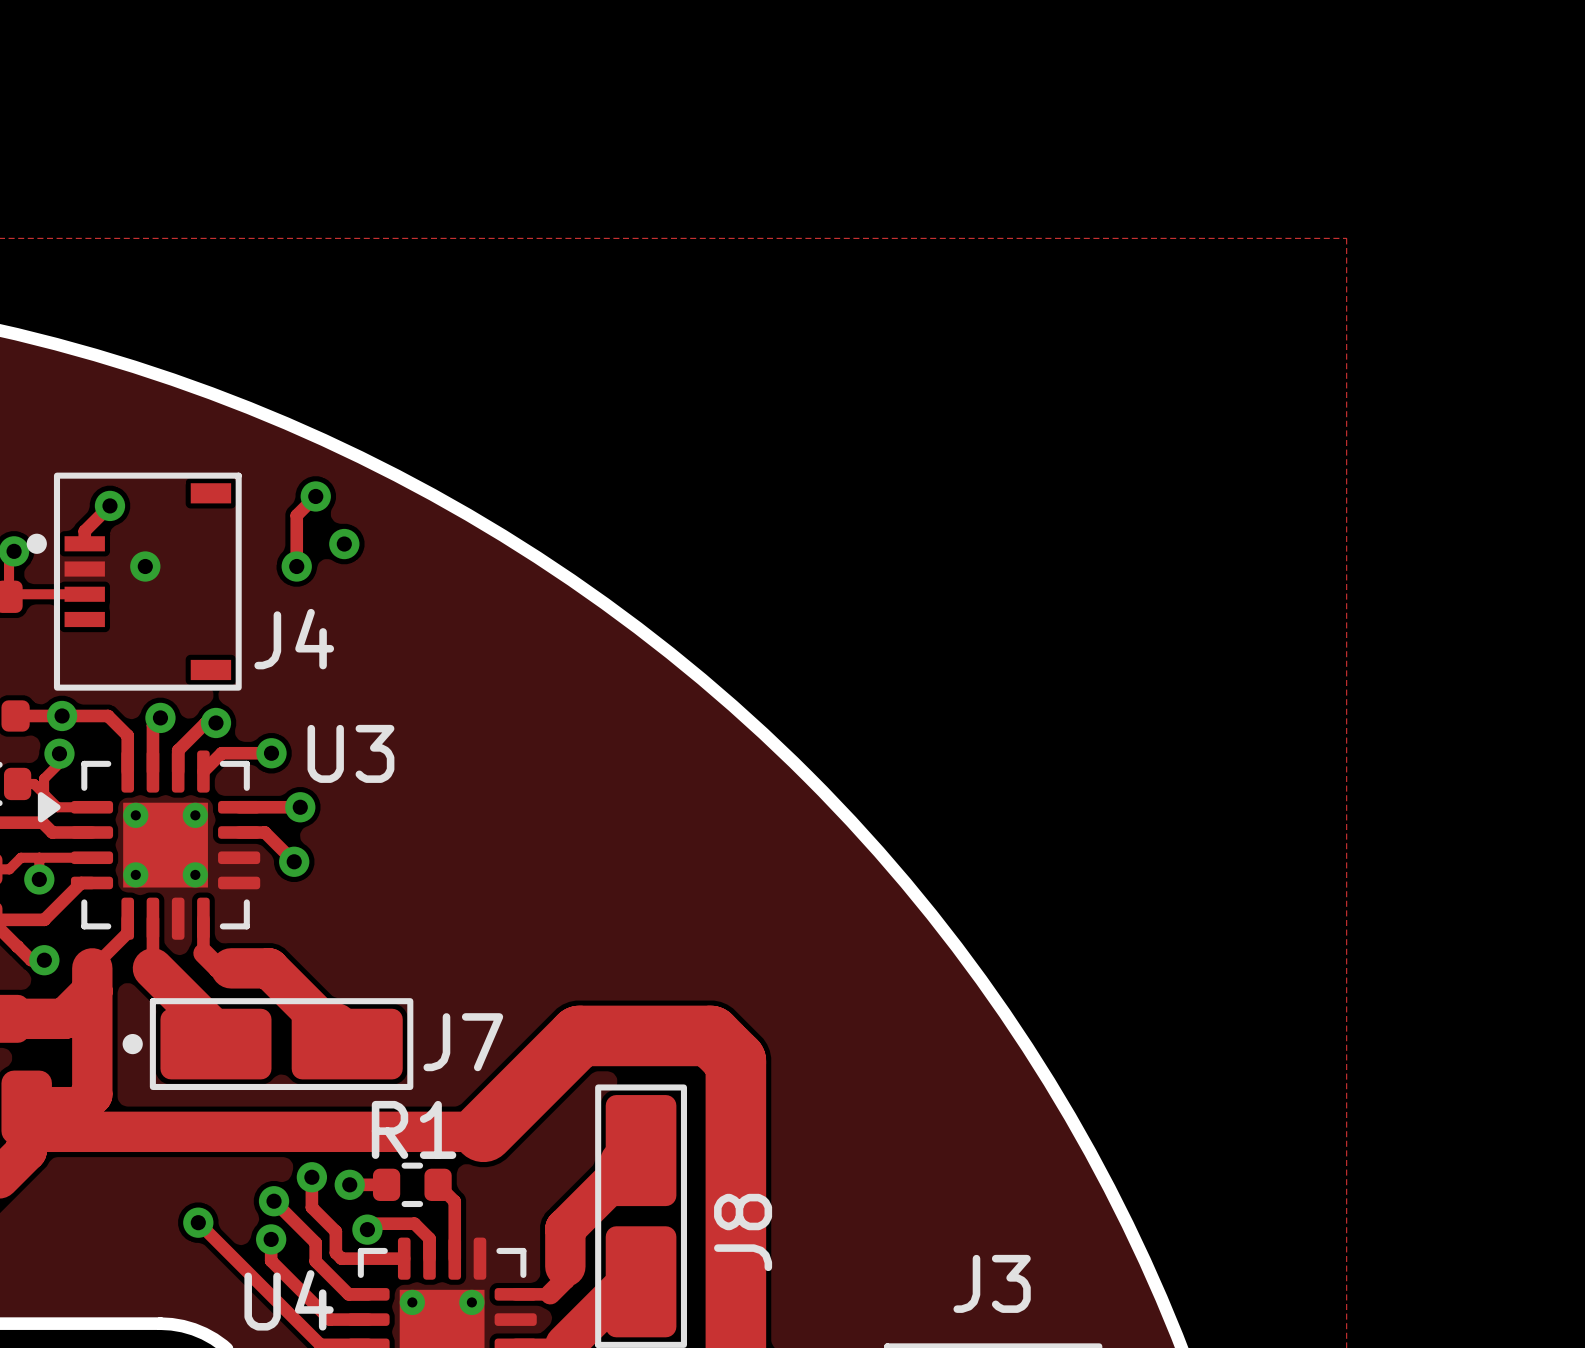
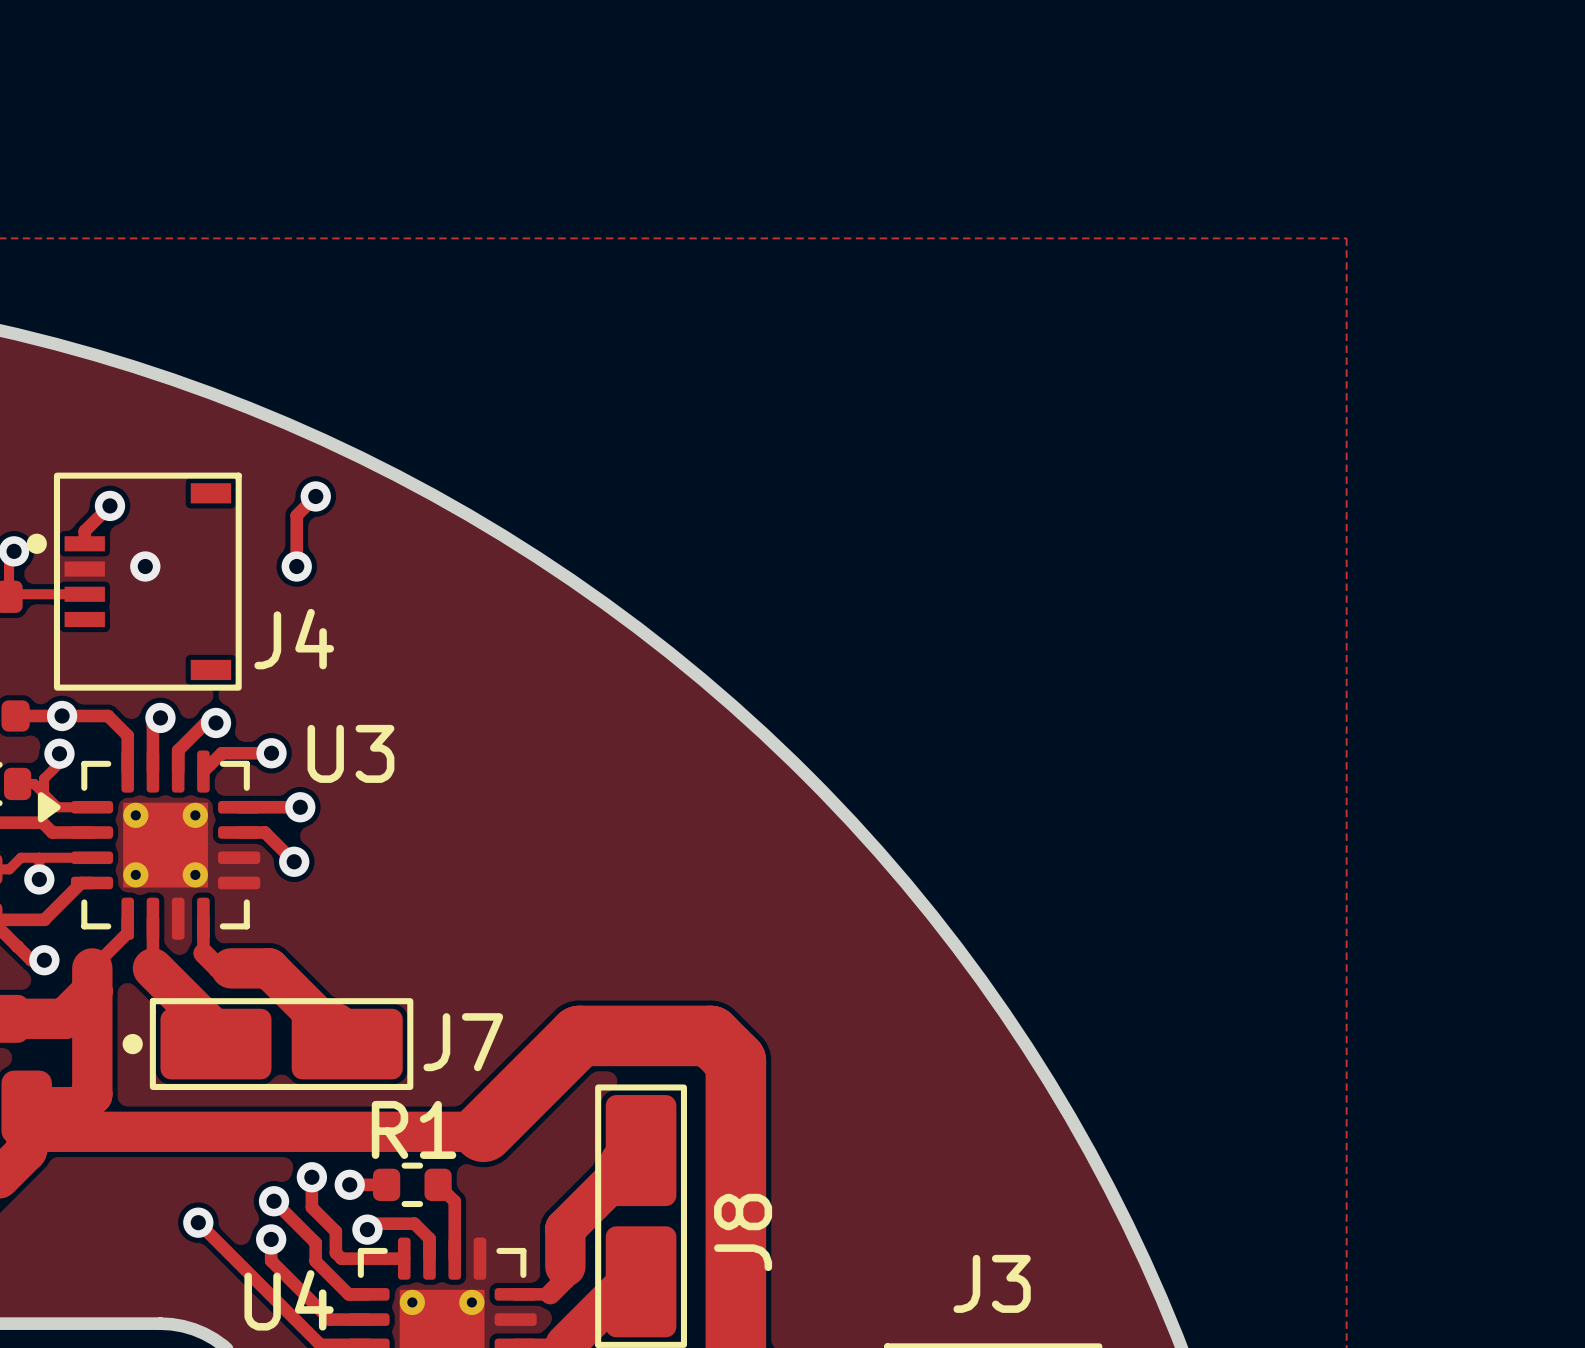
via: (344, 544) -> none

